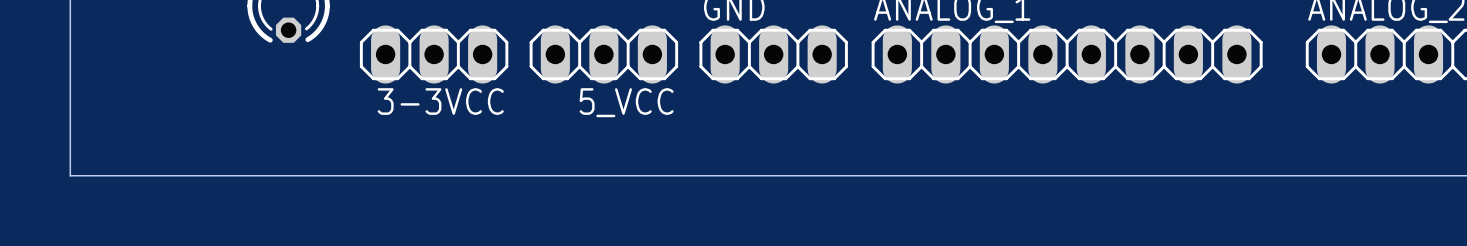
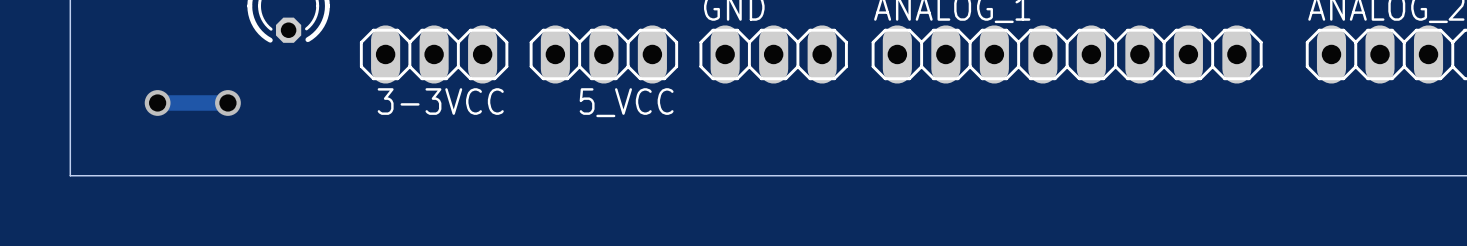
track: none -> (157, 102) (227, 102)
via: none -> (157, 102)
via: none -> (227, 102)

